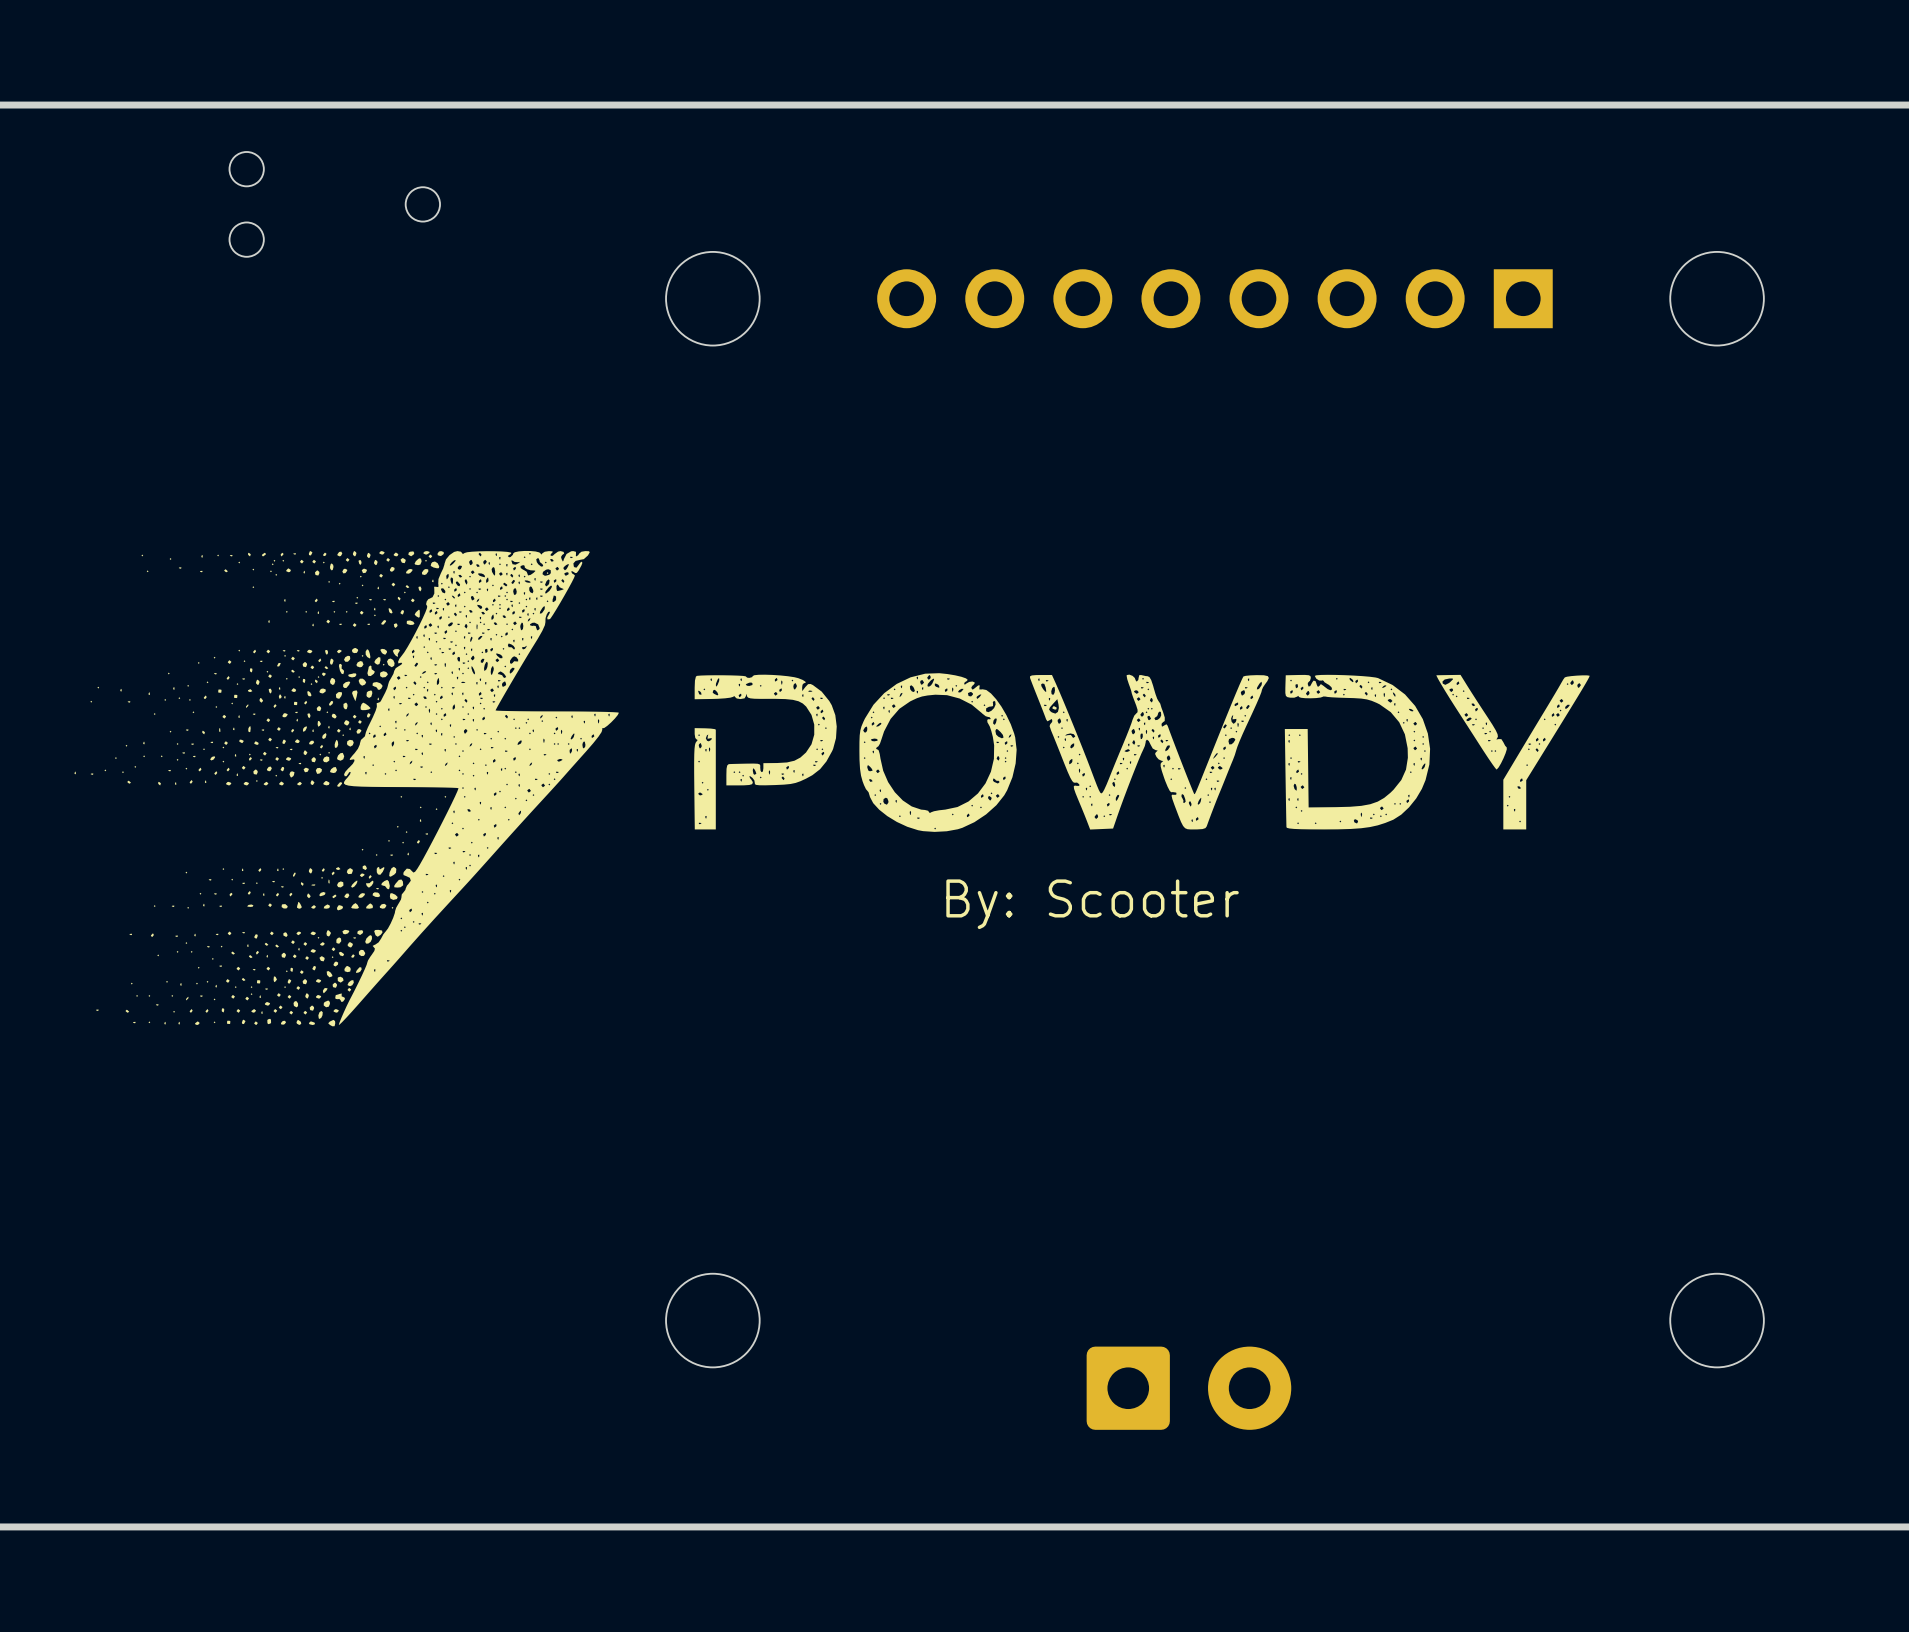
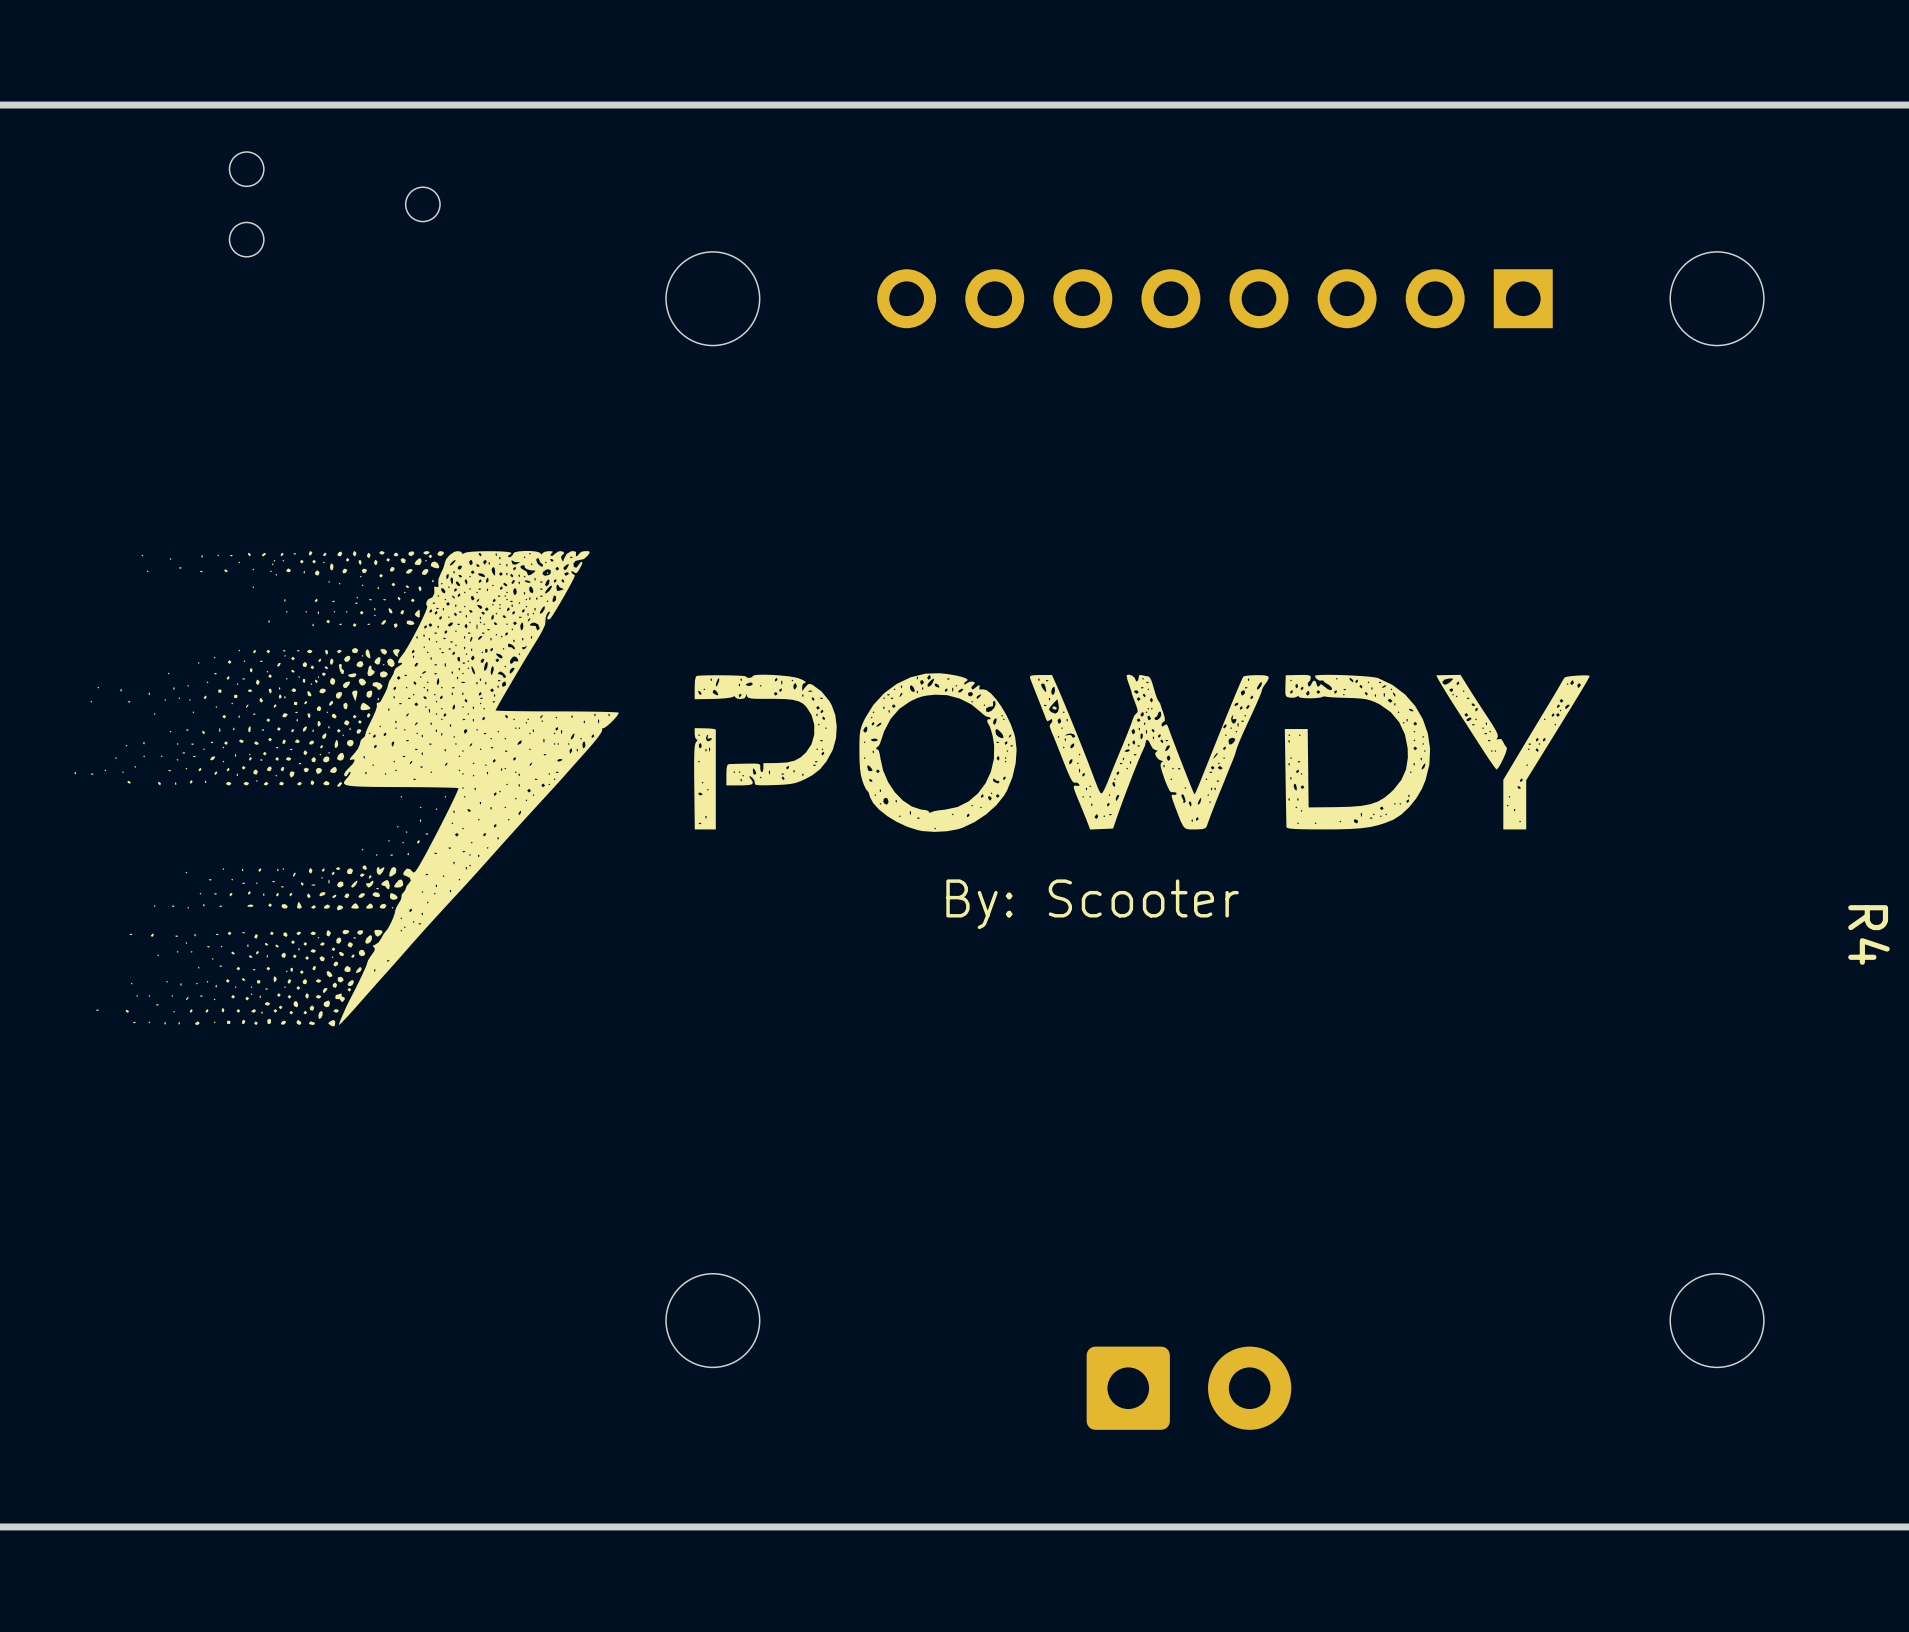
R4: none -> (1868, 934)

